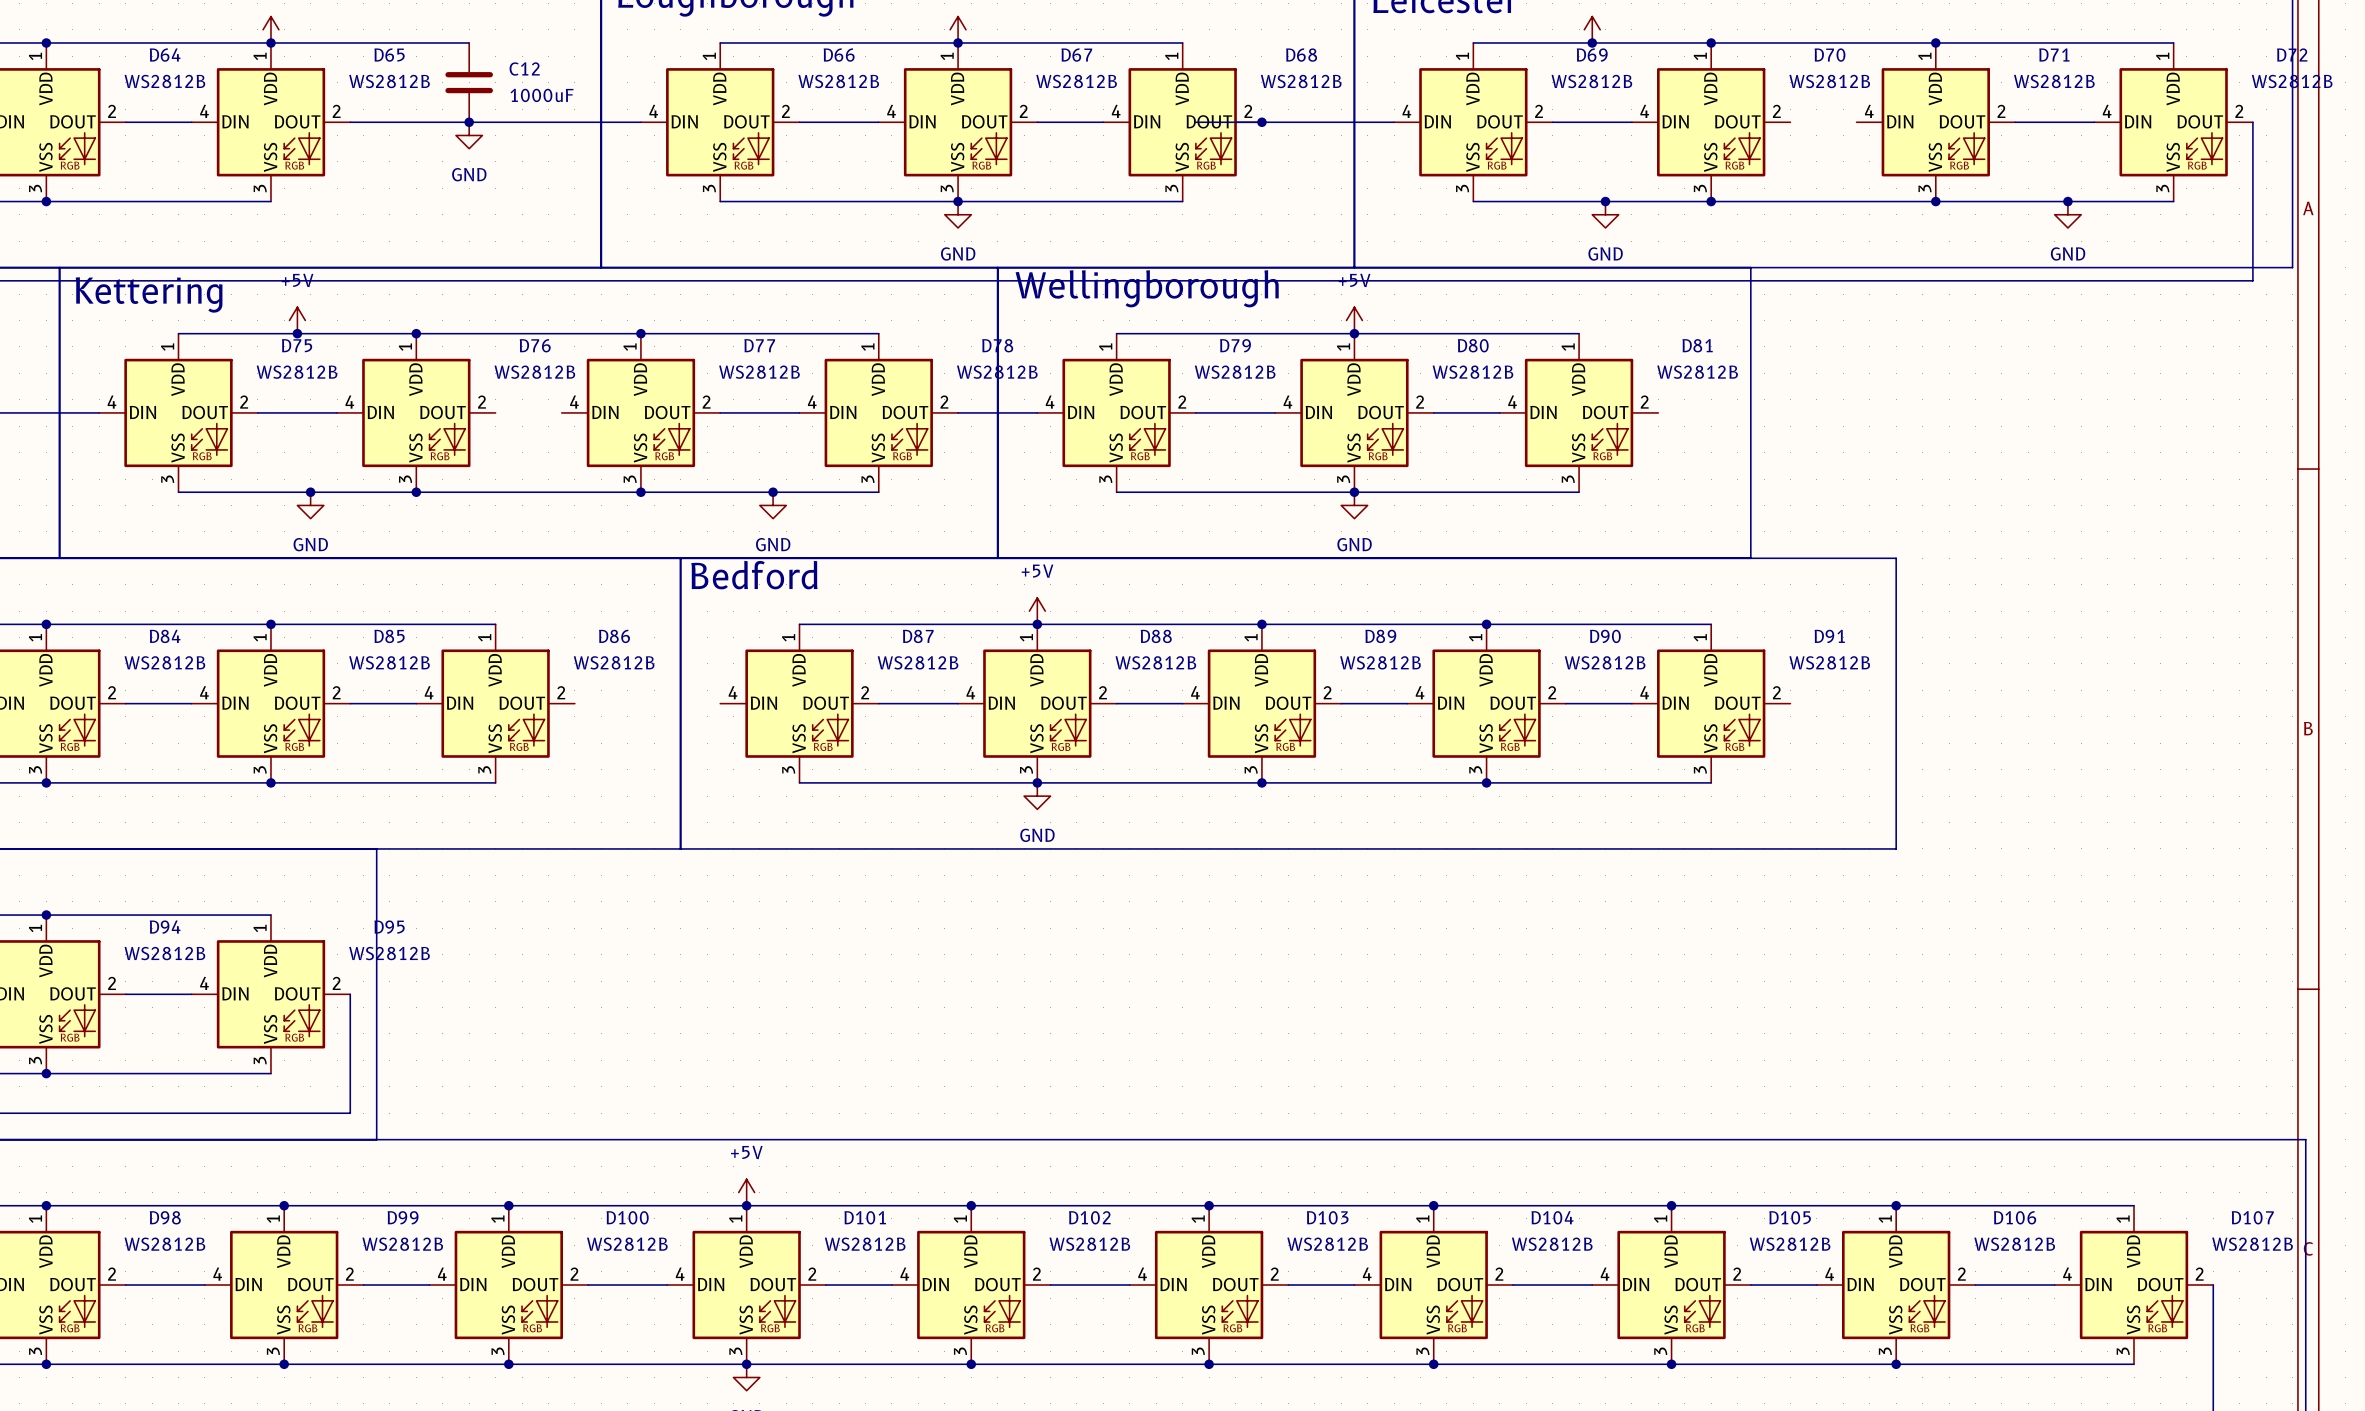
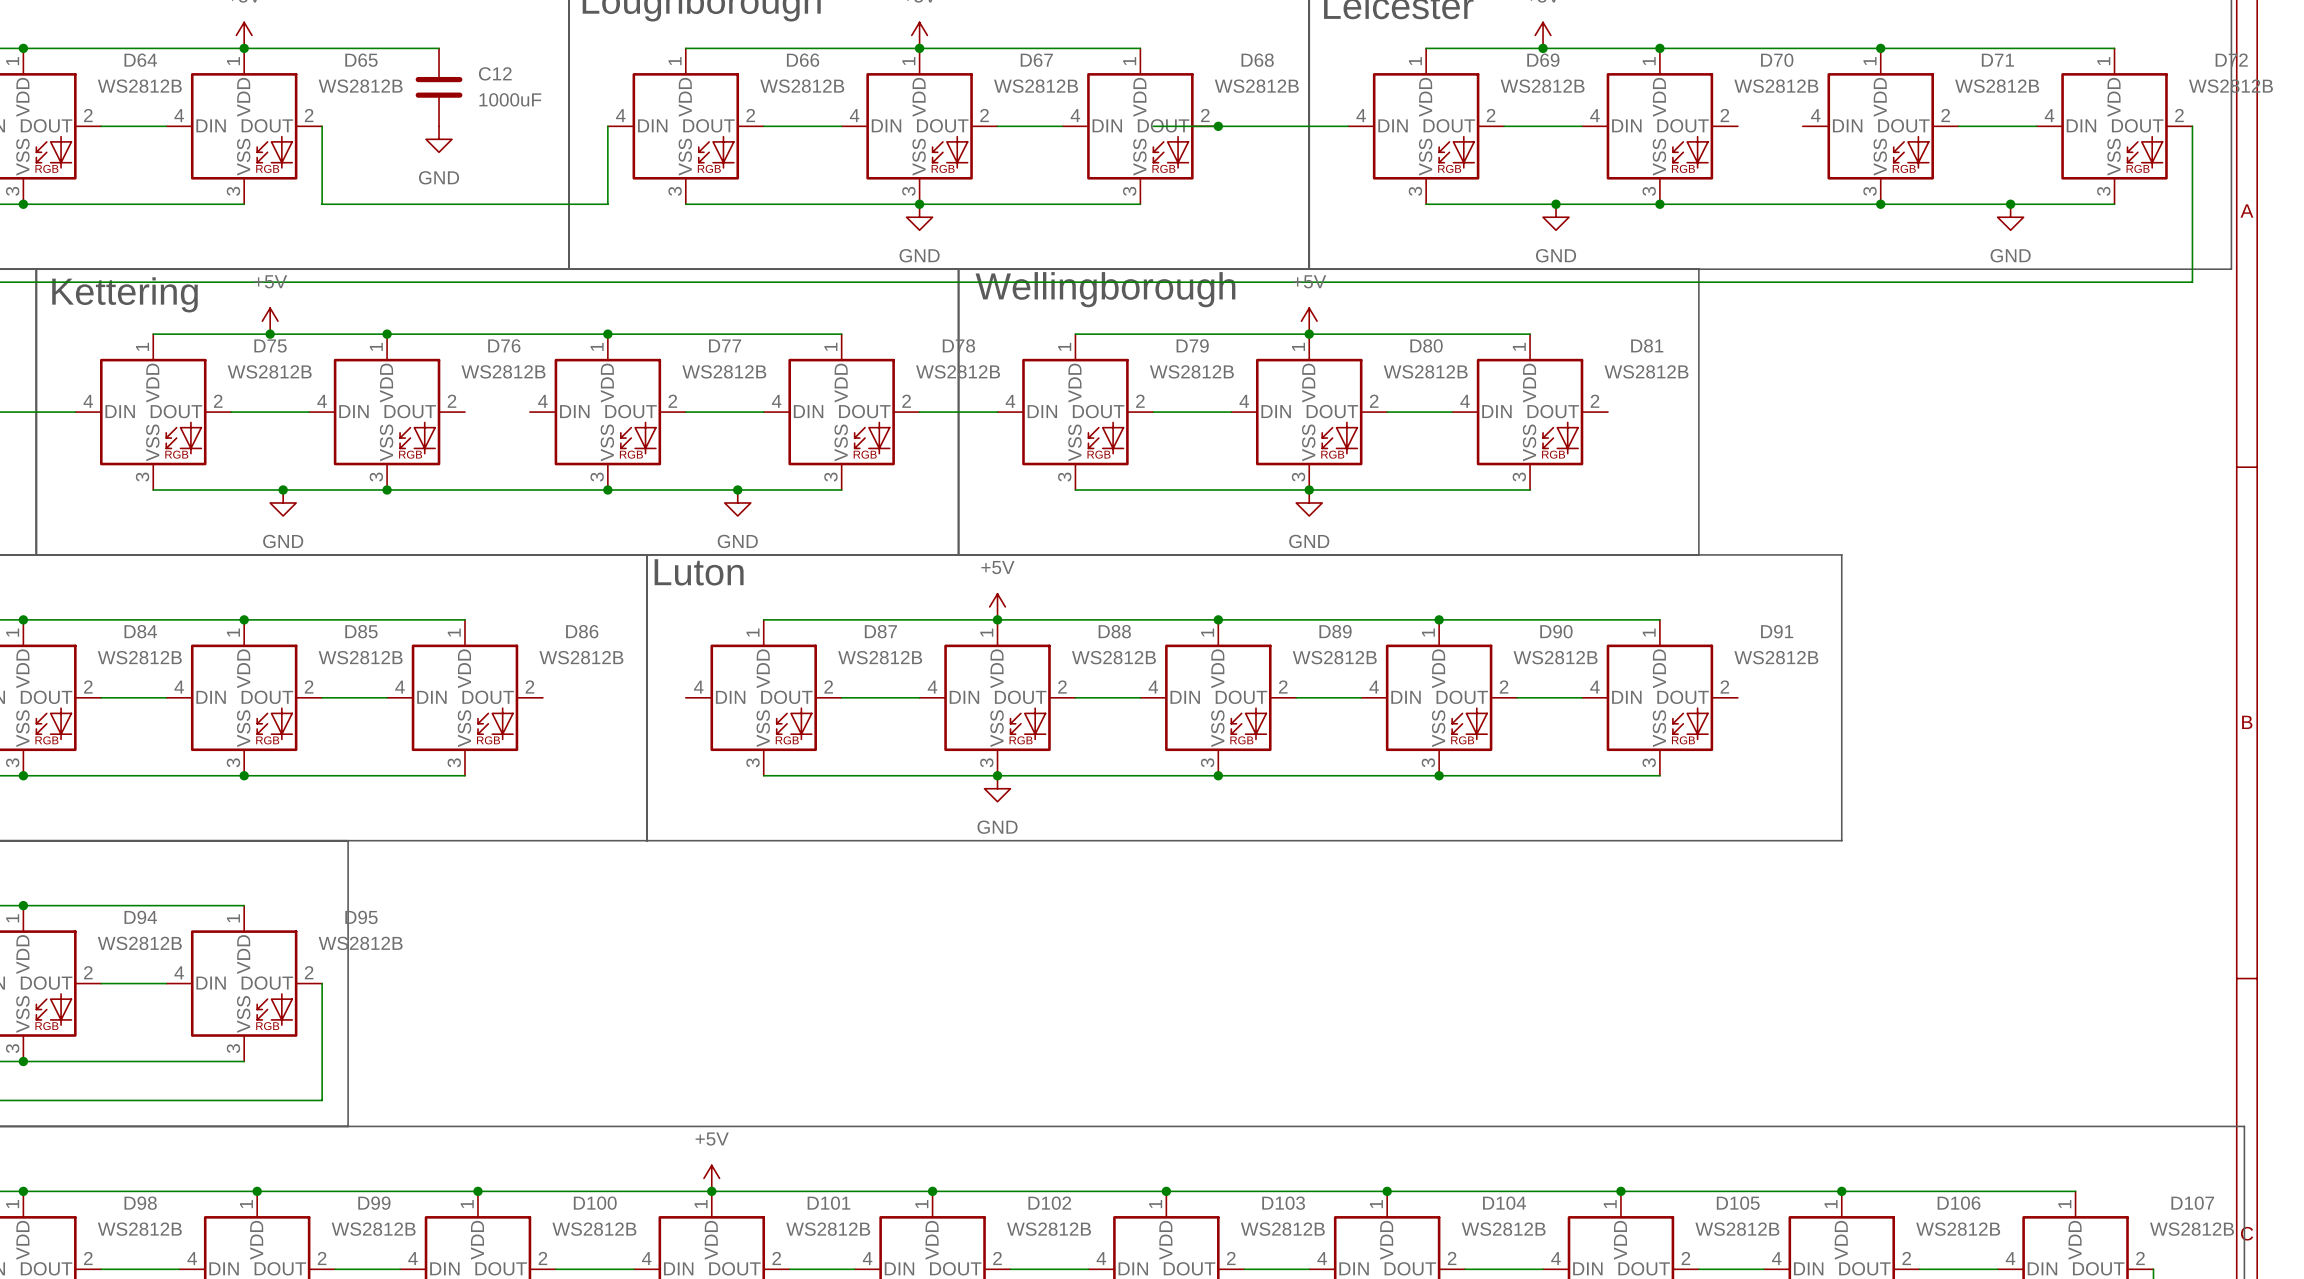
wire: (350, 122) (640, 122) -> (322, 126) (322, 204) (607, 204) (607, 126)
junction: (469, 122) -> none
text: none -> Luton (699, 572)
text: Bedford (754, 575) -> none

